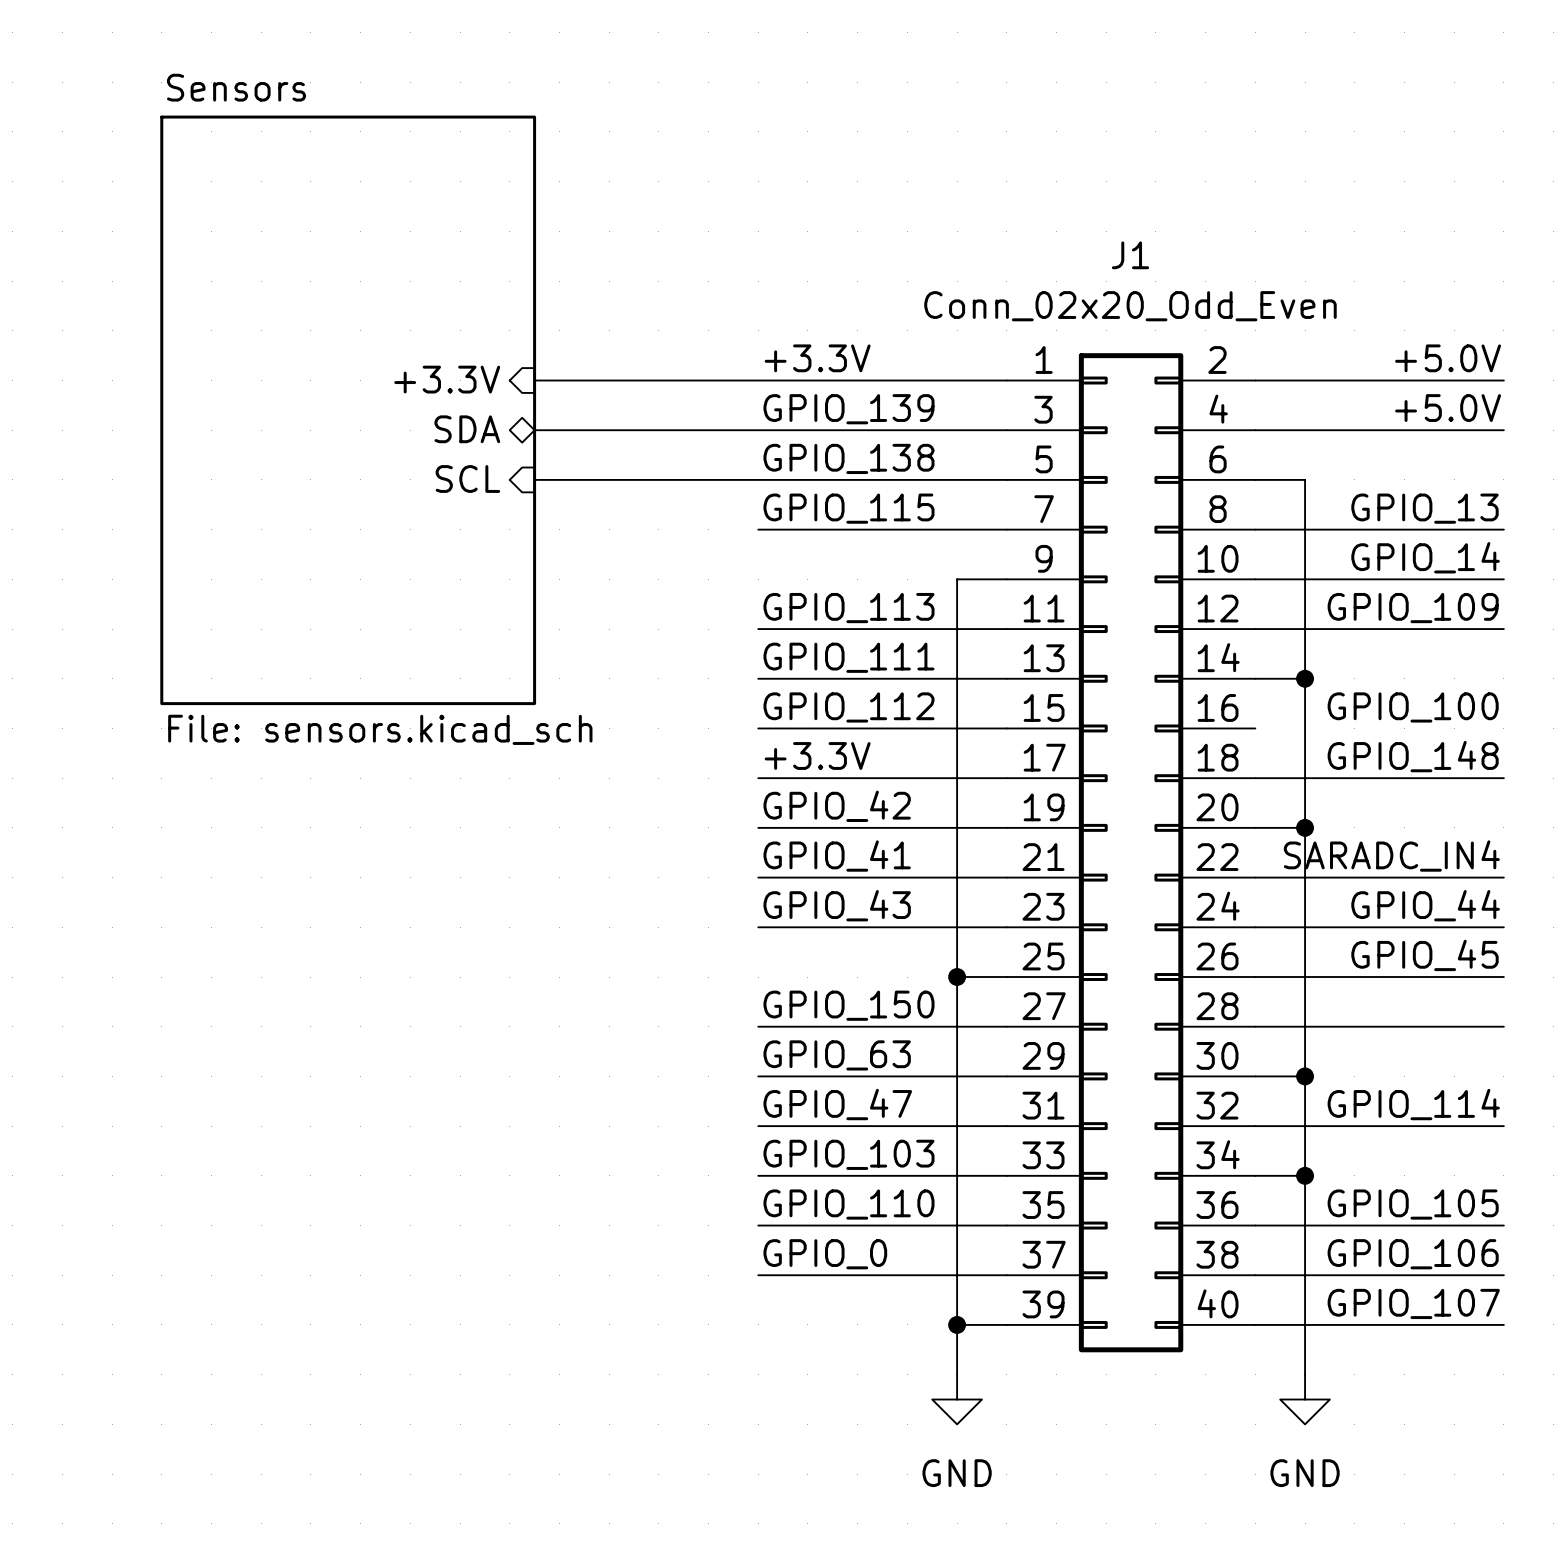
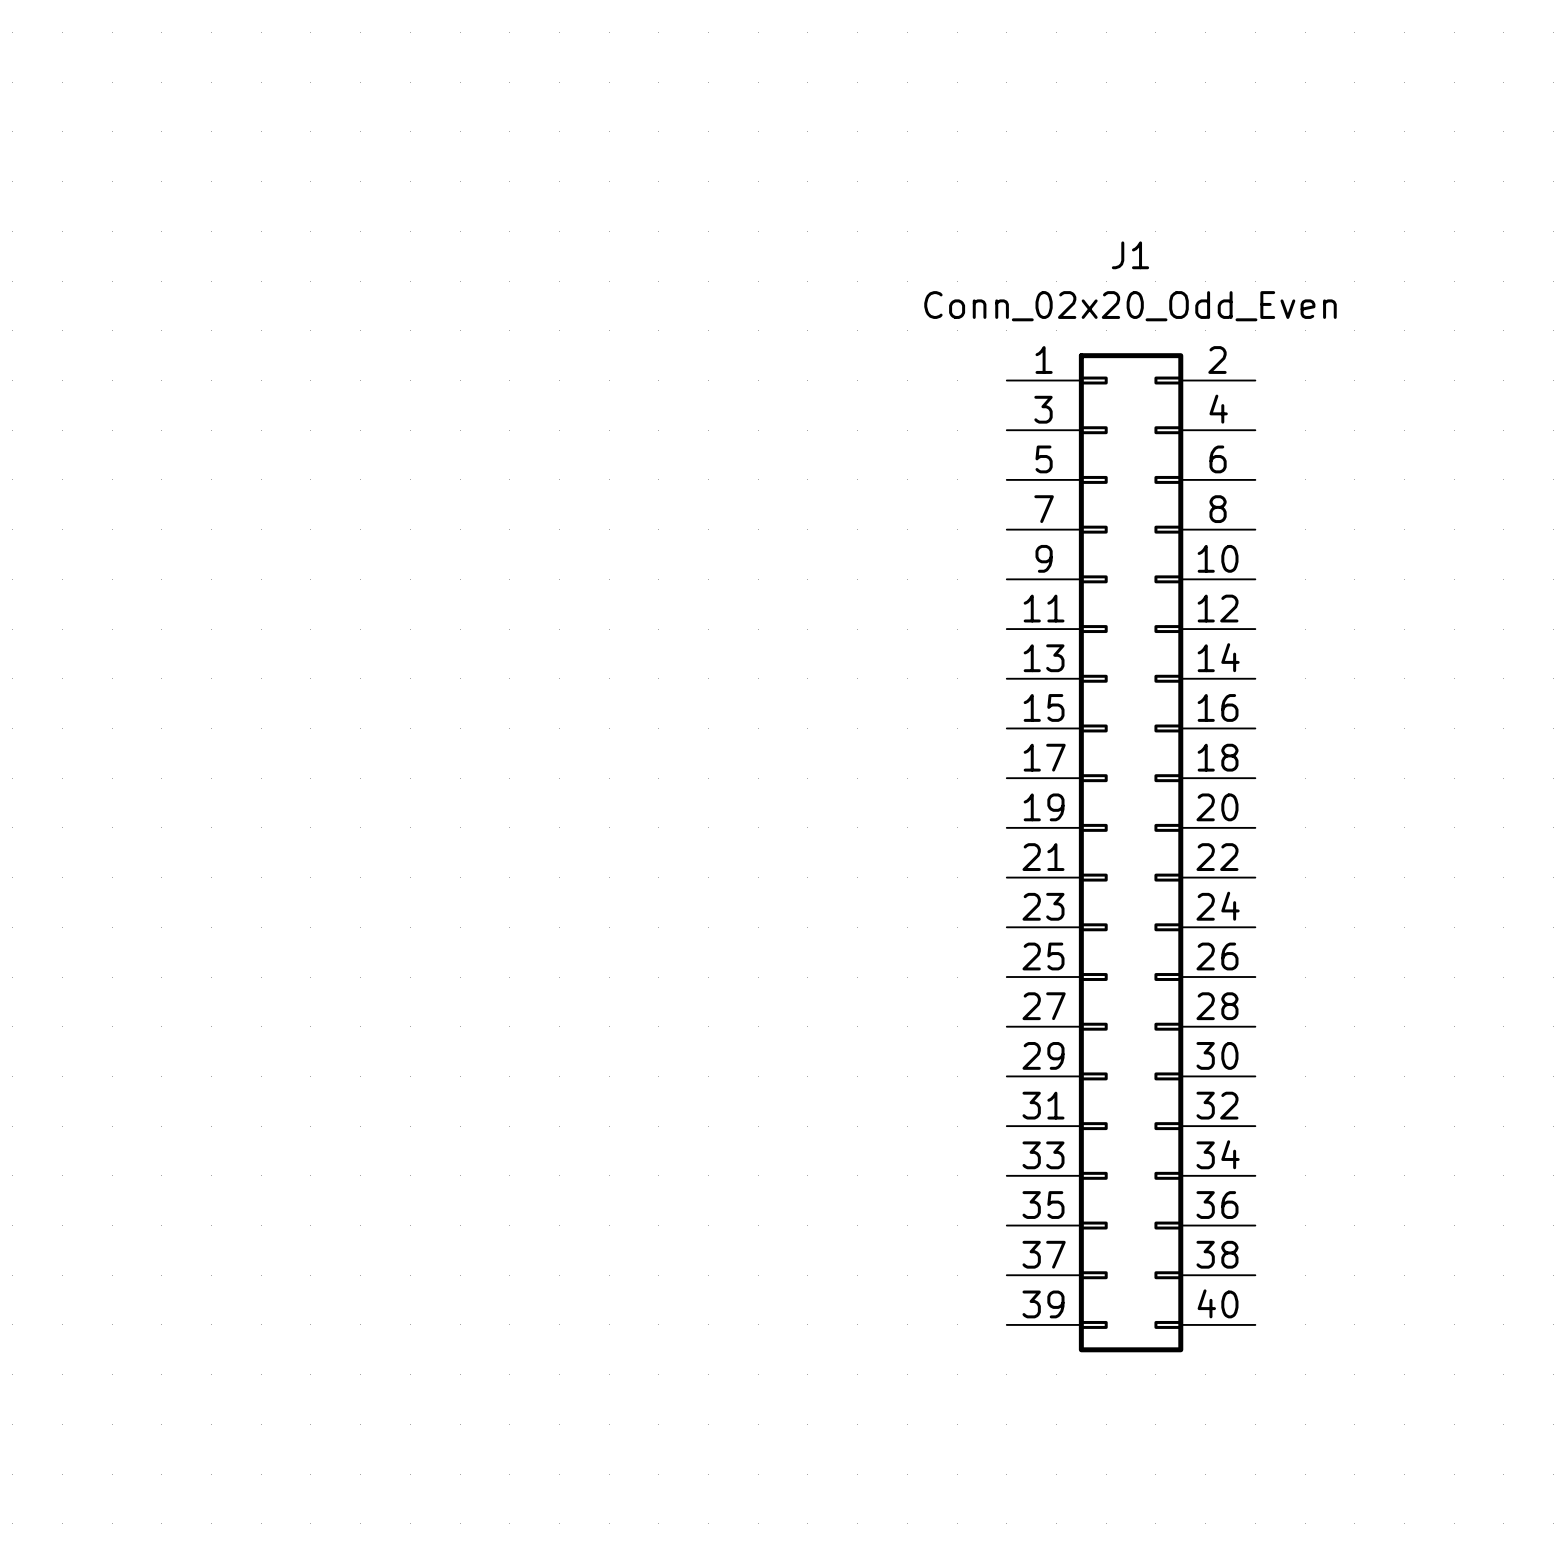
label: +3.3V (817, 358) -> none
label: +5.0V (1448, 358) -> none
sheet pin: +3.3V (447, 379) -> none
wire: (534, 380) (1006, 380) -> none
wire: (1255, 380) (1503, 380) -> none
label: +5.0V (1448, 408) -> none
label: GPIO_139 (848, 409) -> none
sheet Sensors: File: sensors.kicad_sch (348, 410) -> none
sheet pin: SDA (467, 429) -> none
wire: (534, 430) (1006, 430) -> none
wire: (1255, 430) (1503, 430) -> none
label: GPIO_138 (848, 458) -> none
sheet pin: SCL (467, 479) -> none
wire: (534, 479) (1006, 479) -> none
wire: (1255, 479) (1305, 479) (1305, 1374) -> none
label: GPIO_115 (848, 508) -> none
label: GPIO_13 (1424, 508) -> none
wire: (758, 529) (1006, 529) -> none
wire: (1255, 529) (1503, 529) -> none
label: GPIO_14 (1425, 557) -> none
wire: (1006, 579) (957, 579) (957, 1374) -> none
wire: (1255, 579) (1503, 579) -> none
label: GPIO_113 (848, 608) -> none
label: GPIO_109 (1413, 608) -> none
wire: (758, 629) (1006, 629) -> none
wire: (1255, 629) (1503, 629) -> none
label: GPIO_111 (848, 657) -> none
wire: (758, 678) (1006, 678) -> none
wire: (1255, 678) (1305, 678) -> none
junction: (1305, 678) -> none
label: GPIO_112 (848, 707) -> none
label: GPIO_100 (1413, 707) -> none
wire: (758, 728) (1006, 728) -> none
label: +3.3V (817, 755) -> none
label: GPIO_148 (1413, 756) -> none
wire: (758, 778) (1006, 778) -> none
wire: (1255, 778) (1503, 778) -> none
label: GPIO_42 (837, 806) -> none
wire: (758, 827) (1006, 827) -> none
wire: (1255, 827) (1305, 827) -> none
junction: (1305, 827) -> none
label: GPIO_41 (837, 856) -> none
label: SARADC_IN4 (1391, 856) -> none
wire: (758, 877) (1006, 877) -> none
wire: (1255, 877) (1503, 877) -> none
label: GPIO_43 (837, 905) -> none
label: GPIO_44 (1425, 905) -> none
wire: (758, 927) (1006, 927) -> none
wire: (1255, 927) (1503, 927) -> none
label: GPIO_45 (1424, 955) -> none
wire: (957, 977) (1006, 977) -> none
junction: (957, 977) -> none
wire: (1255, 977) (1503, 977) -> none
label: GPIO_150 (848, 1005) -> none
wire: (758, 1026) (1006, 1026) -> none
wire: (1255, 1026) (1503, 1026) -> none
label: GPIO_63 (837, 1055) -> none
wire: (758, 1076) (1006, 1076) -> none
wire: (1255, 1076) (1305, 1076) -> none
junction: (1305, 1076) -> none
label: GPIO_47 (837, 1104) -> none
label: GPIO_114 (1413, 1104) -> none
wire: (758, 1126) (1006, 1126) -> none
wire: (1255, 1126) (1503, 1126) -> none
label: GPIO_103 (848, 1154) -> none
wire: (758, 1175) (1006, 1175) -> none
wire: (1255, 1175) (1305, 1175) -> none
junction: (1305, 1175) -> none
label: GPIO_110 (848, 1204) -> none
label: GPIO_105 (1413, 1204) -> none
wire: (758, 1225) (1006, 1225) -> none
wire: (1255, 1225) (1503, 1225) -> none
label: GPIO_0 (825, 1254) -> none
label: GPIO_106 (1413, 1254) -> none
wire: (758, 1275) (1006, 1275) -> none
wire: (1255, 1275) (1503, 1275) -> none
label: GPIO_107 (1413, 1303) -> none
wire: (957, 1324) (1006, 1324) -> none
junction: (957, 1324) -> none
wire: (1255, 1324) (1503, 1324) -> none
power symbol: GND (957, 1399) -> none
power symbol: GND (1305, 1399) -> none

